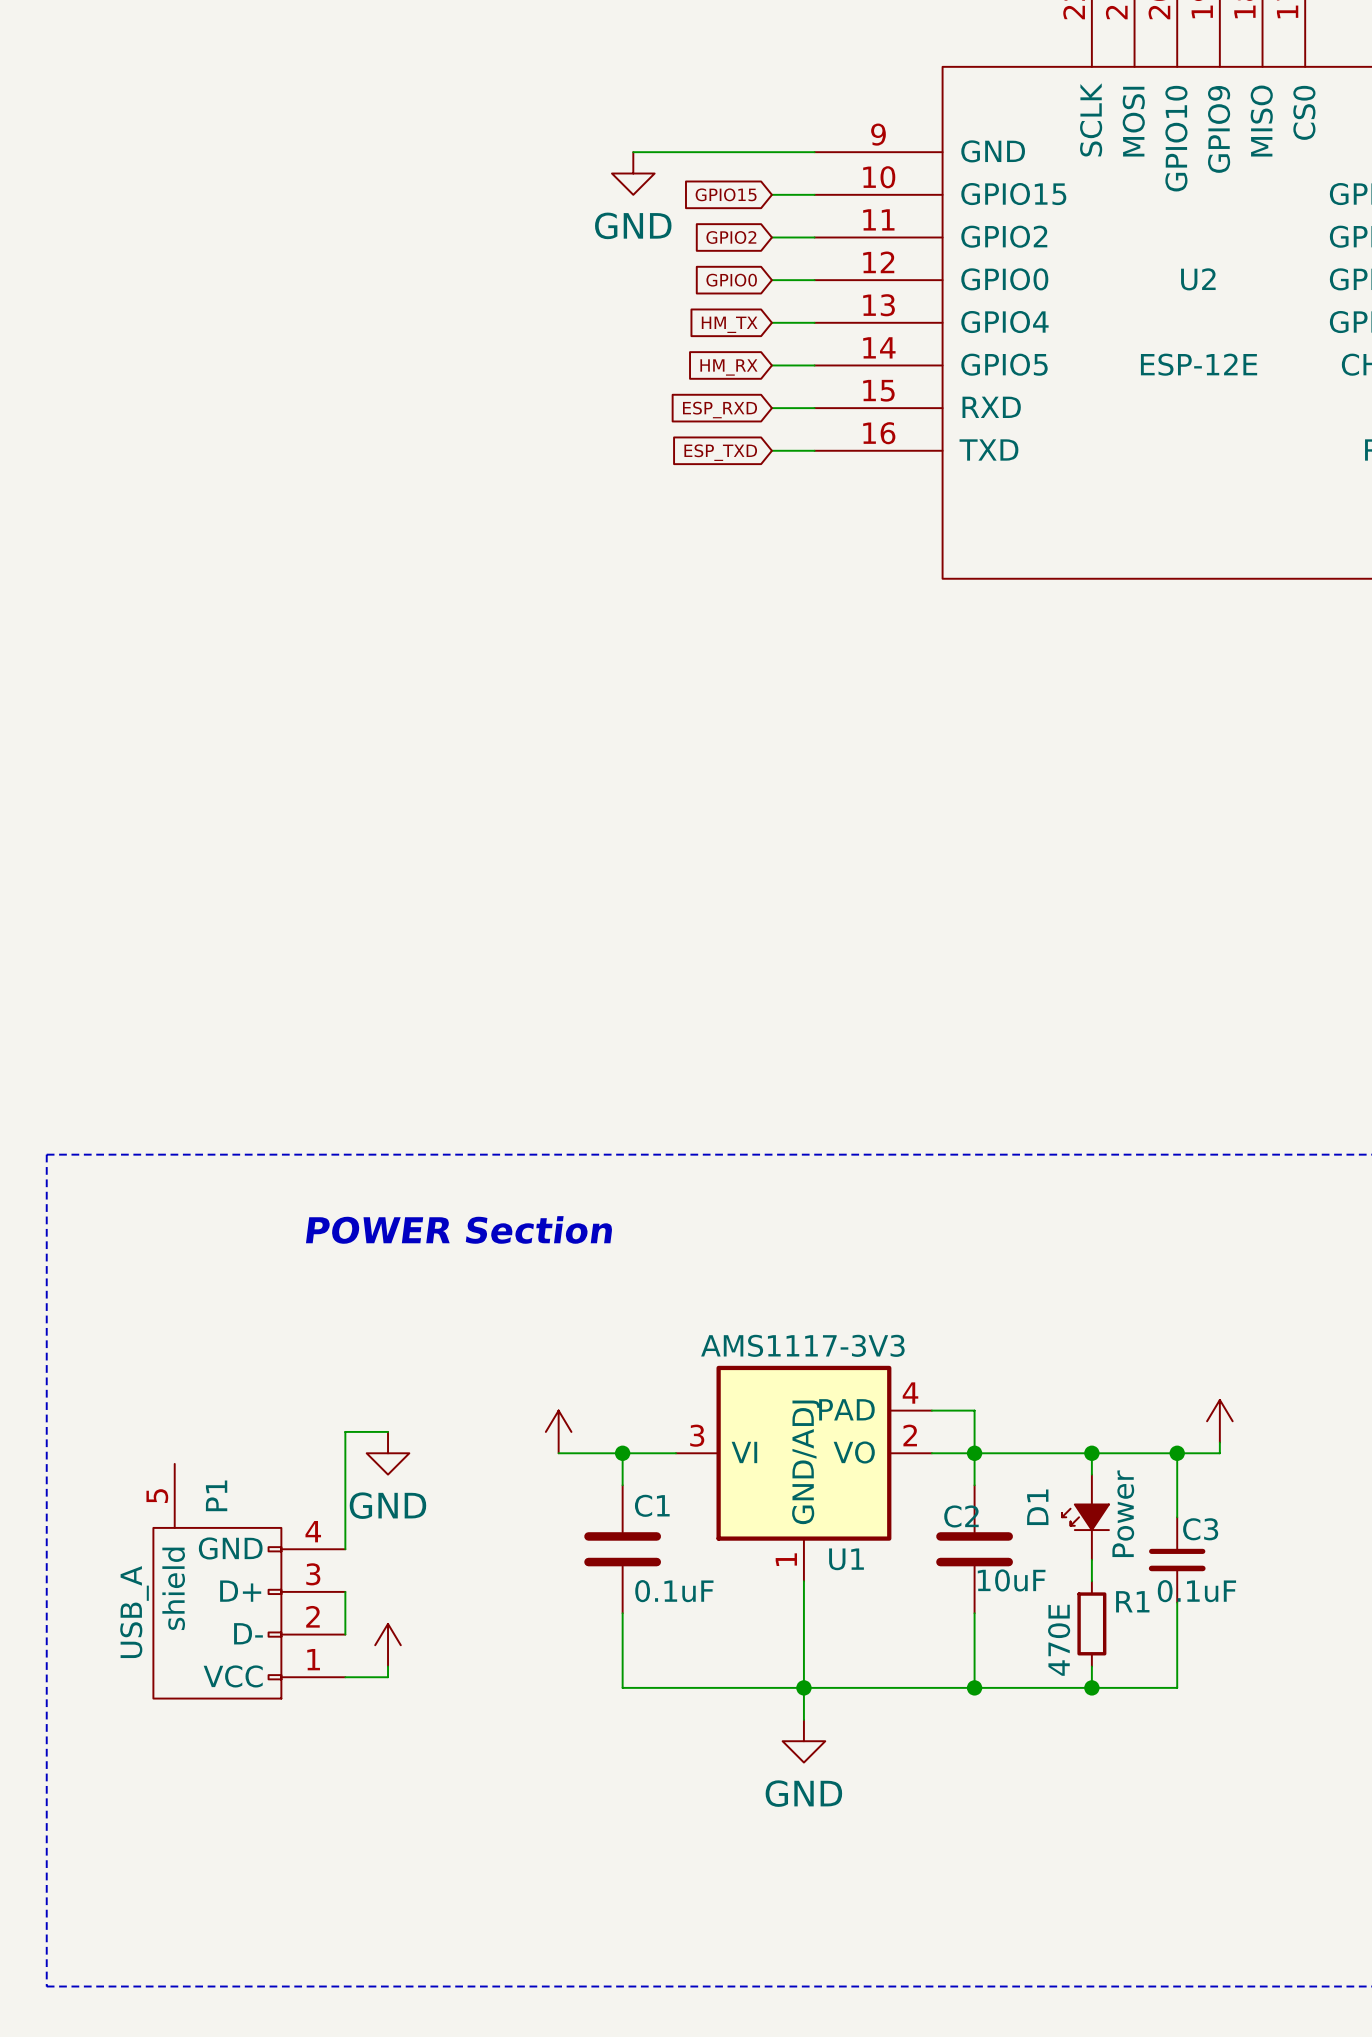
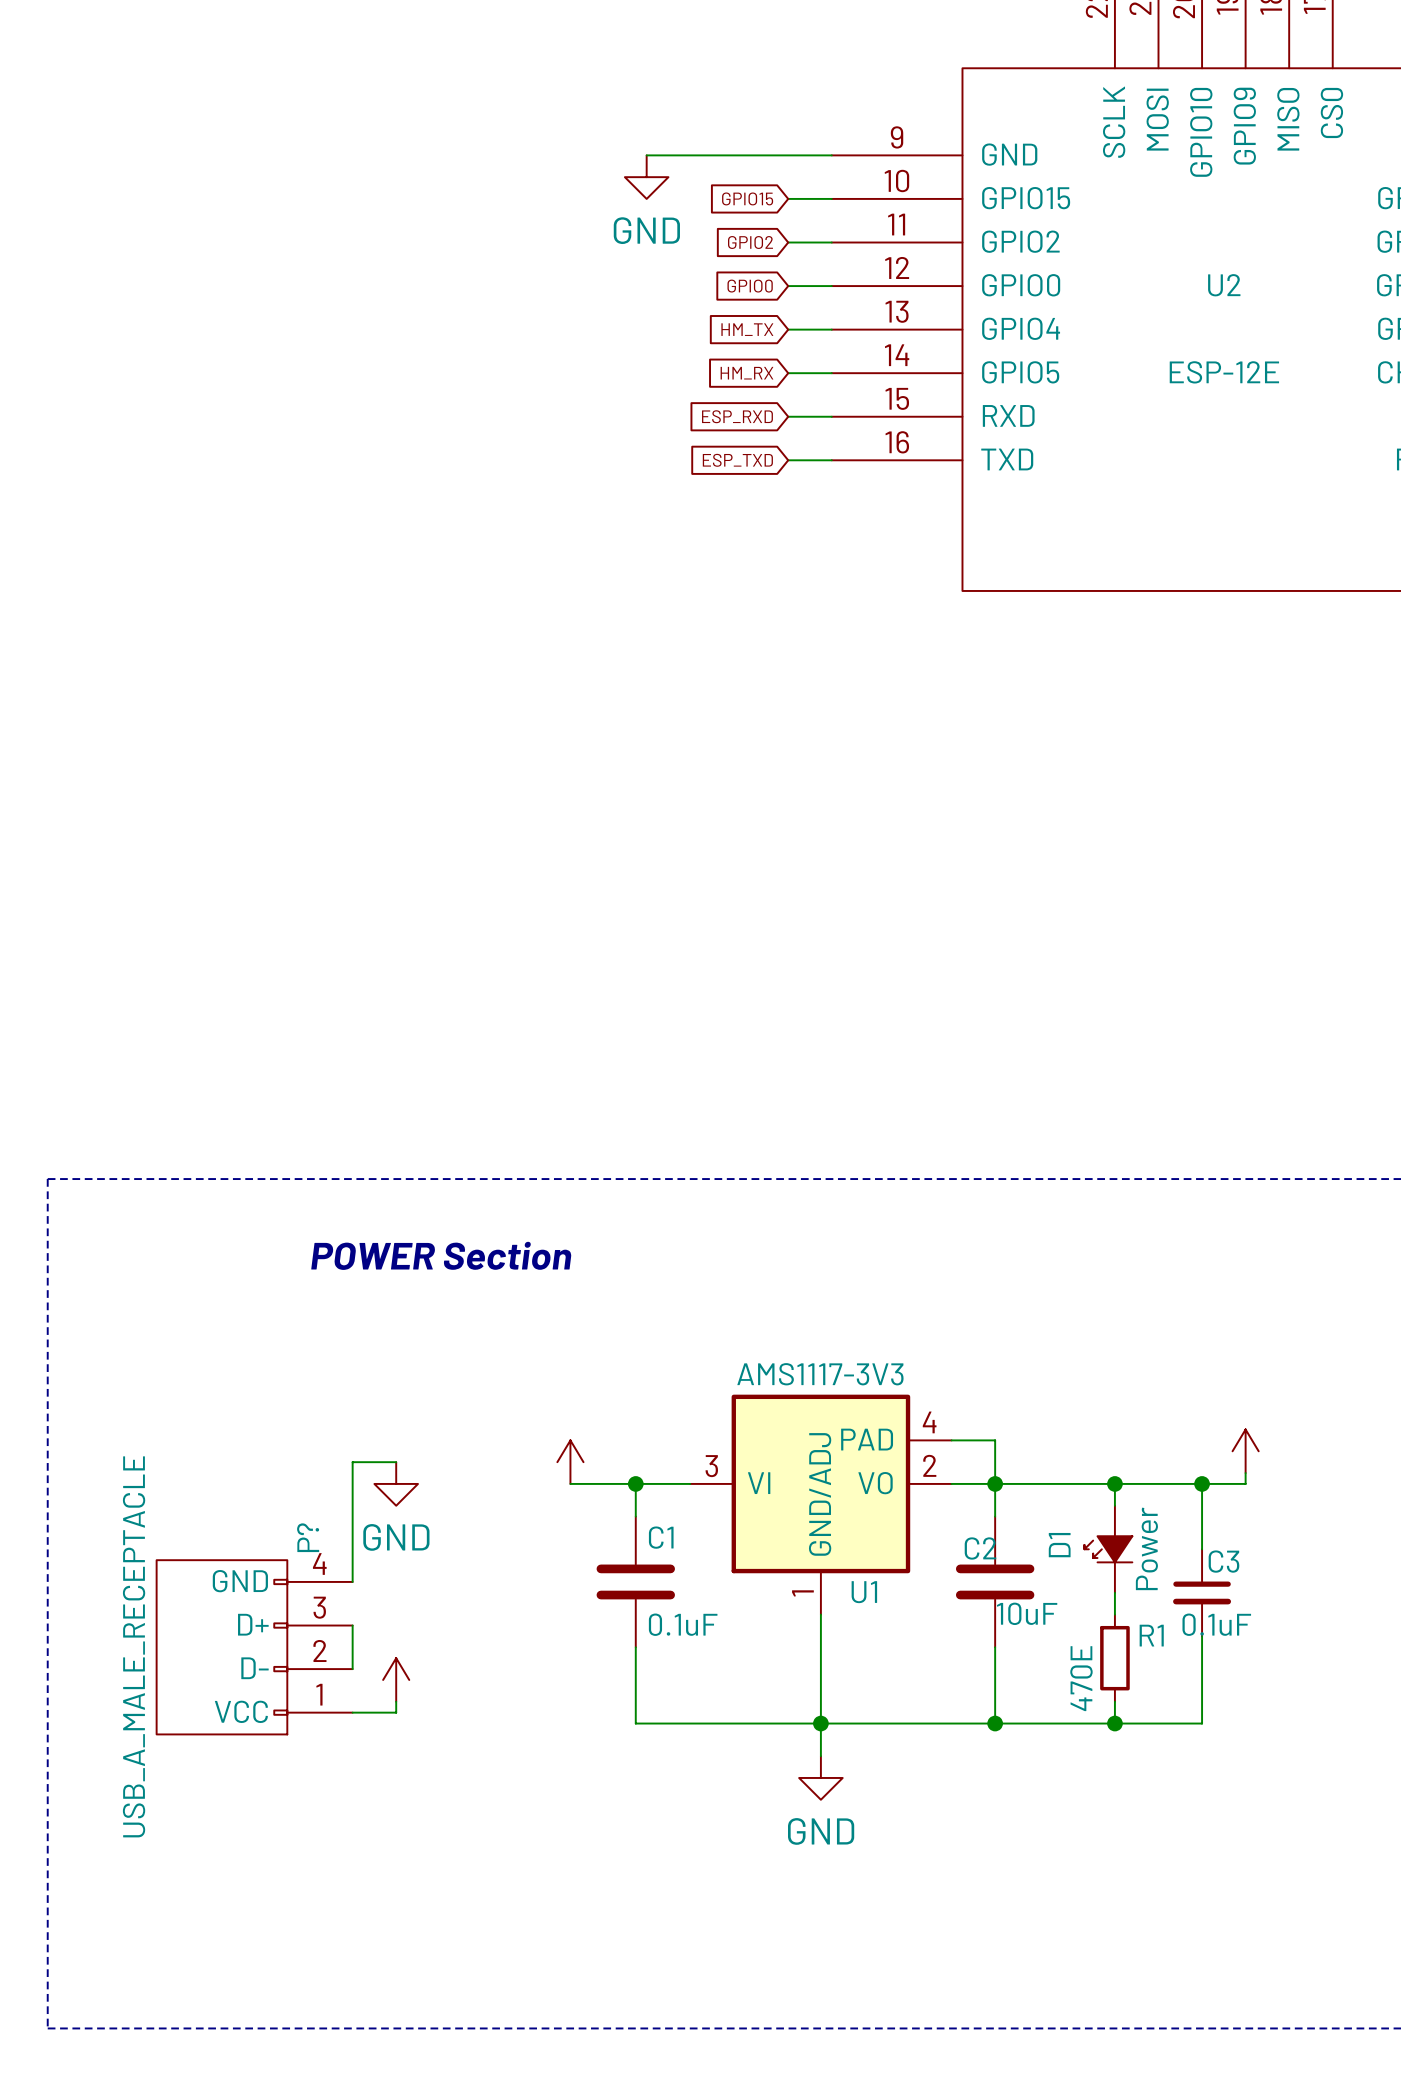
P1: USB_A (249, 1581) -> none
P?: none -> USB_A_MALE_RECEPTACLE (254, 1647)

